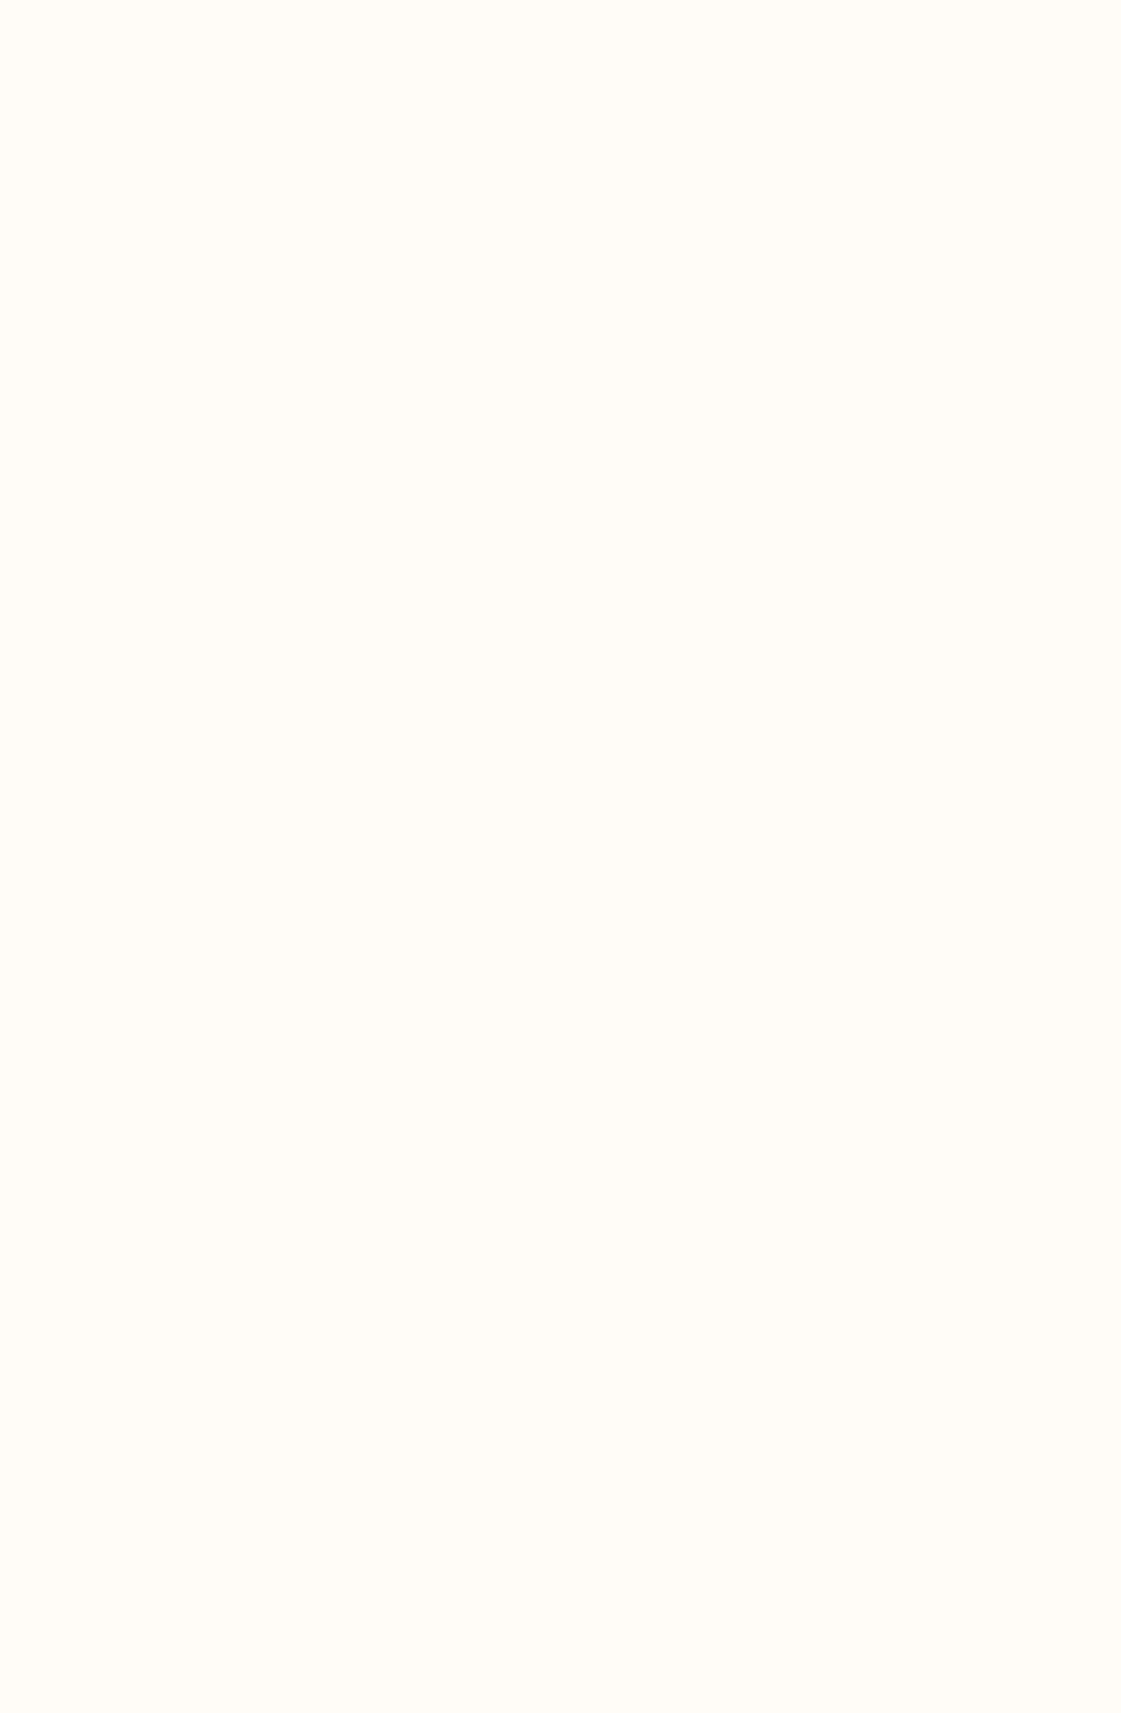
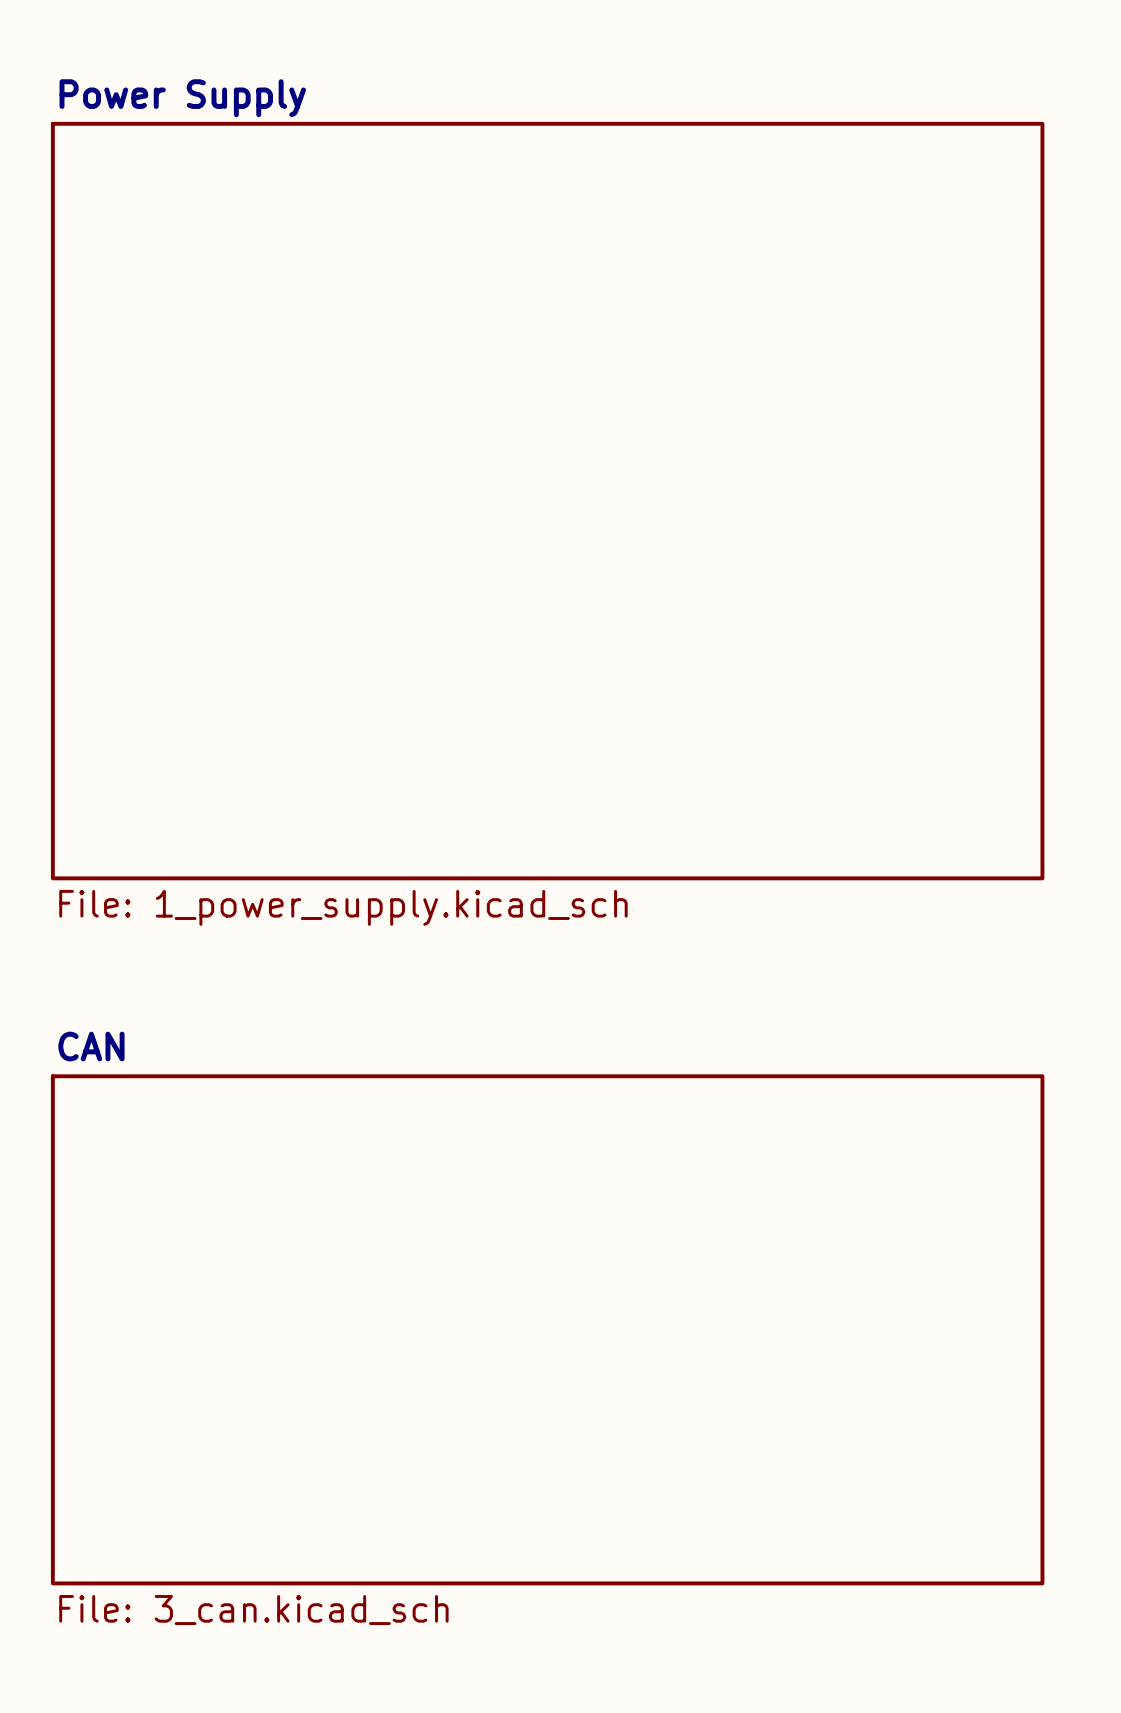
sheet Power Supply: none -> File: 1_power_supply.kicad_sch (547, 501)
sheet CAN: none -> File: 3_can.kicad_sch (547, 1329)

